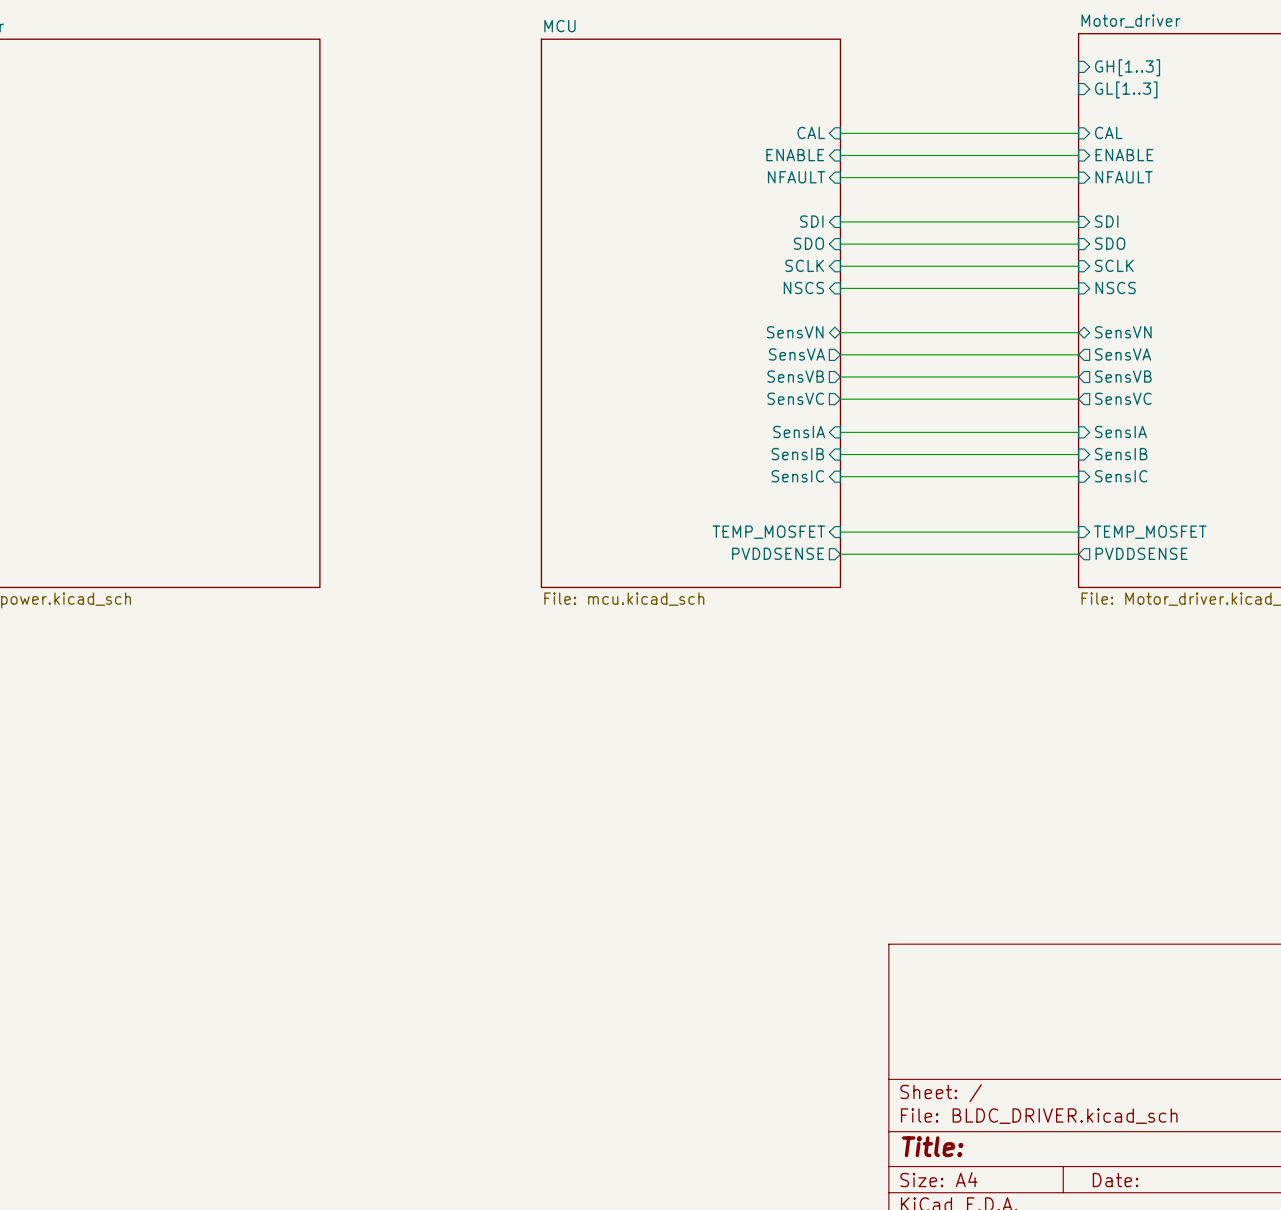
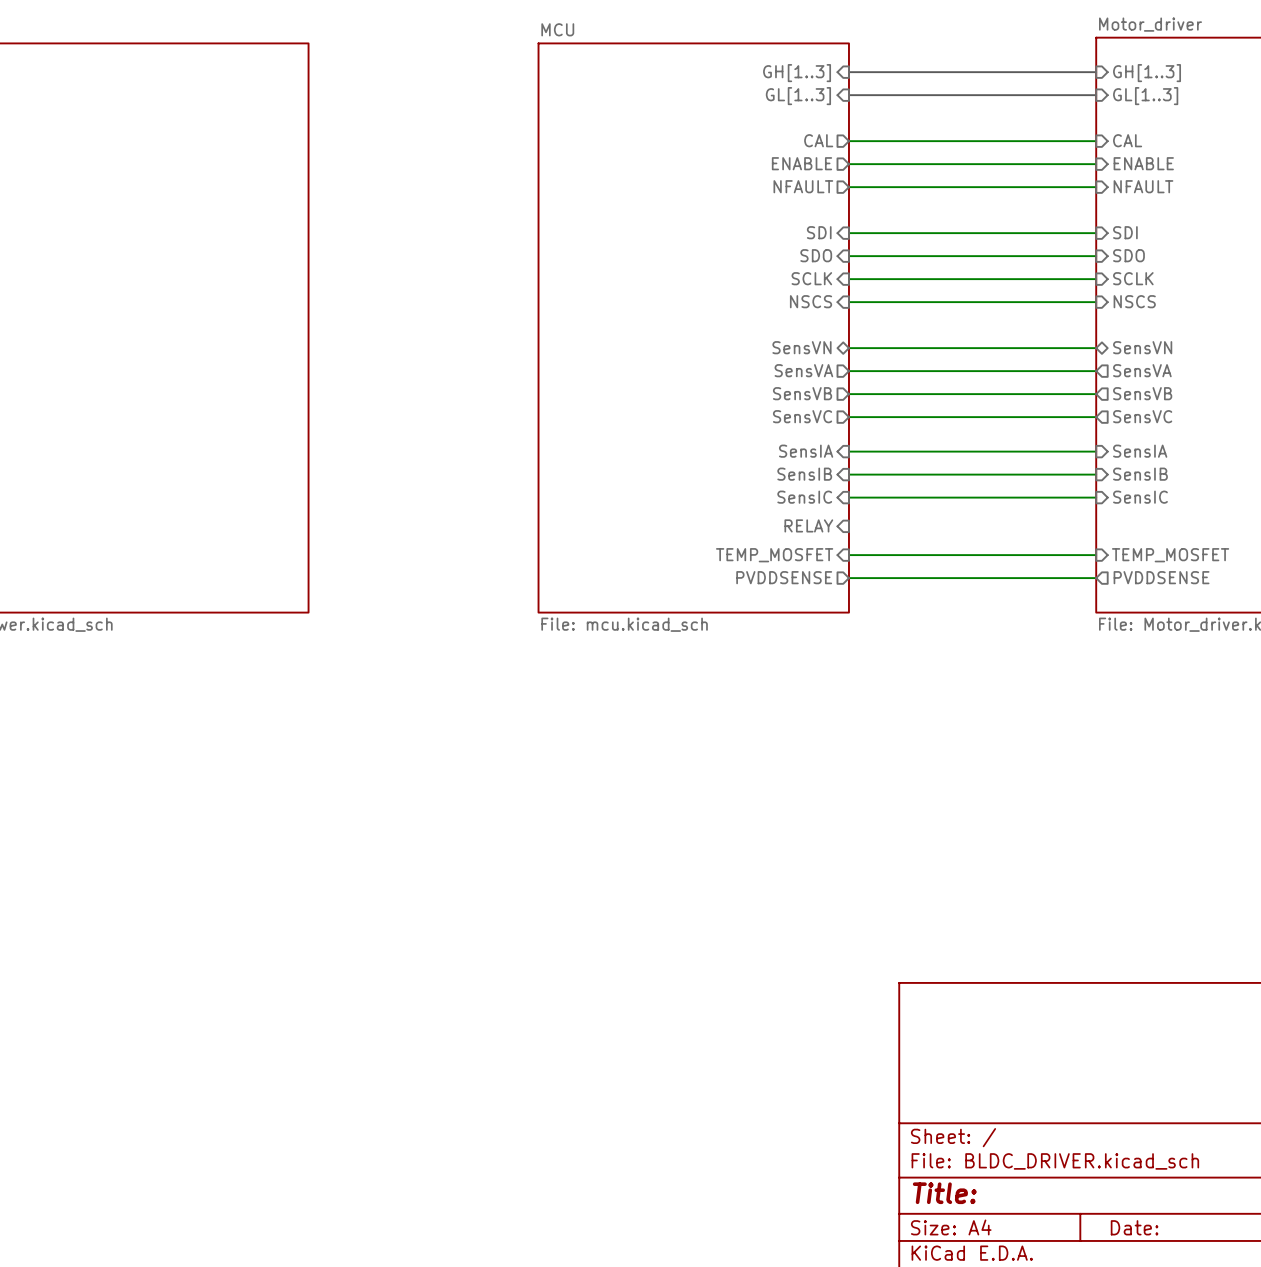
bus: none -> (848, 72) (1096, 72)
sheet pin: none -> GH[1..3] (797, 73)
sheet pin: none -> GL[1..3] (798, 96)
bus: none -> (848, 95) (1096, 95)
sheet pin shape: input (811, 132) -> output (818, 140)
sheet pin shape: input (795, 155) -> output (801, 163)
sheet pin shape: input (796, 177) -> output (803, 186)
sheet pin: none -> RELAY (808, 525)

